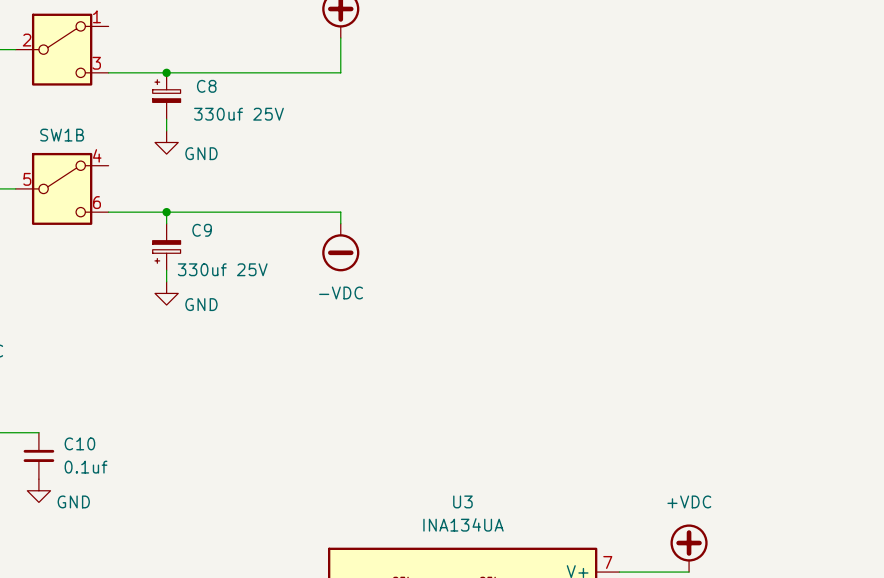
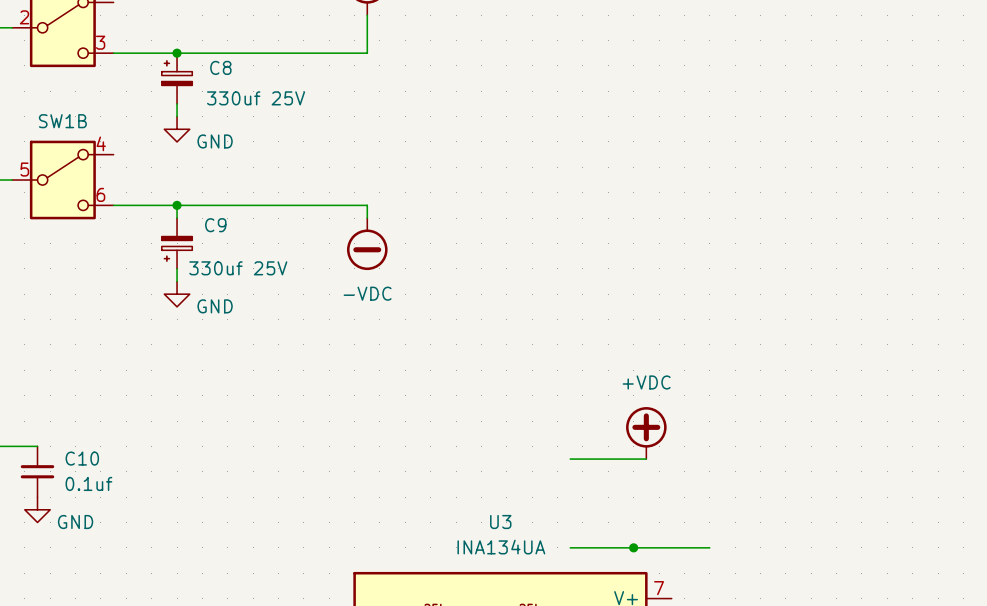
wire: none -> (570, 547) (709, 547)
junction: none -> (633, 547)
power symbol position: +VDC (689, 548) -> +VDC (646, 433)
wire: (619, 572) (689, 572) -> (570, 459) (646, 459)

